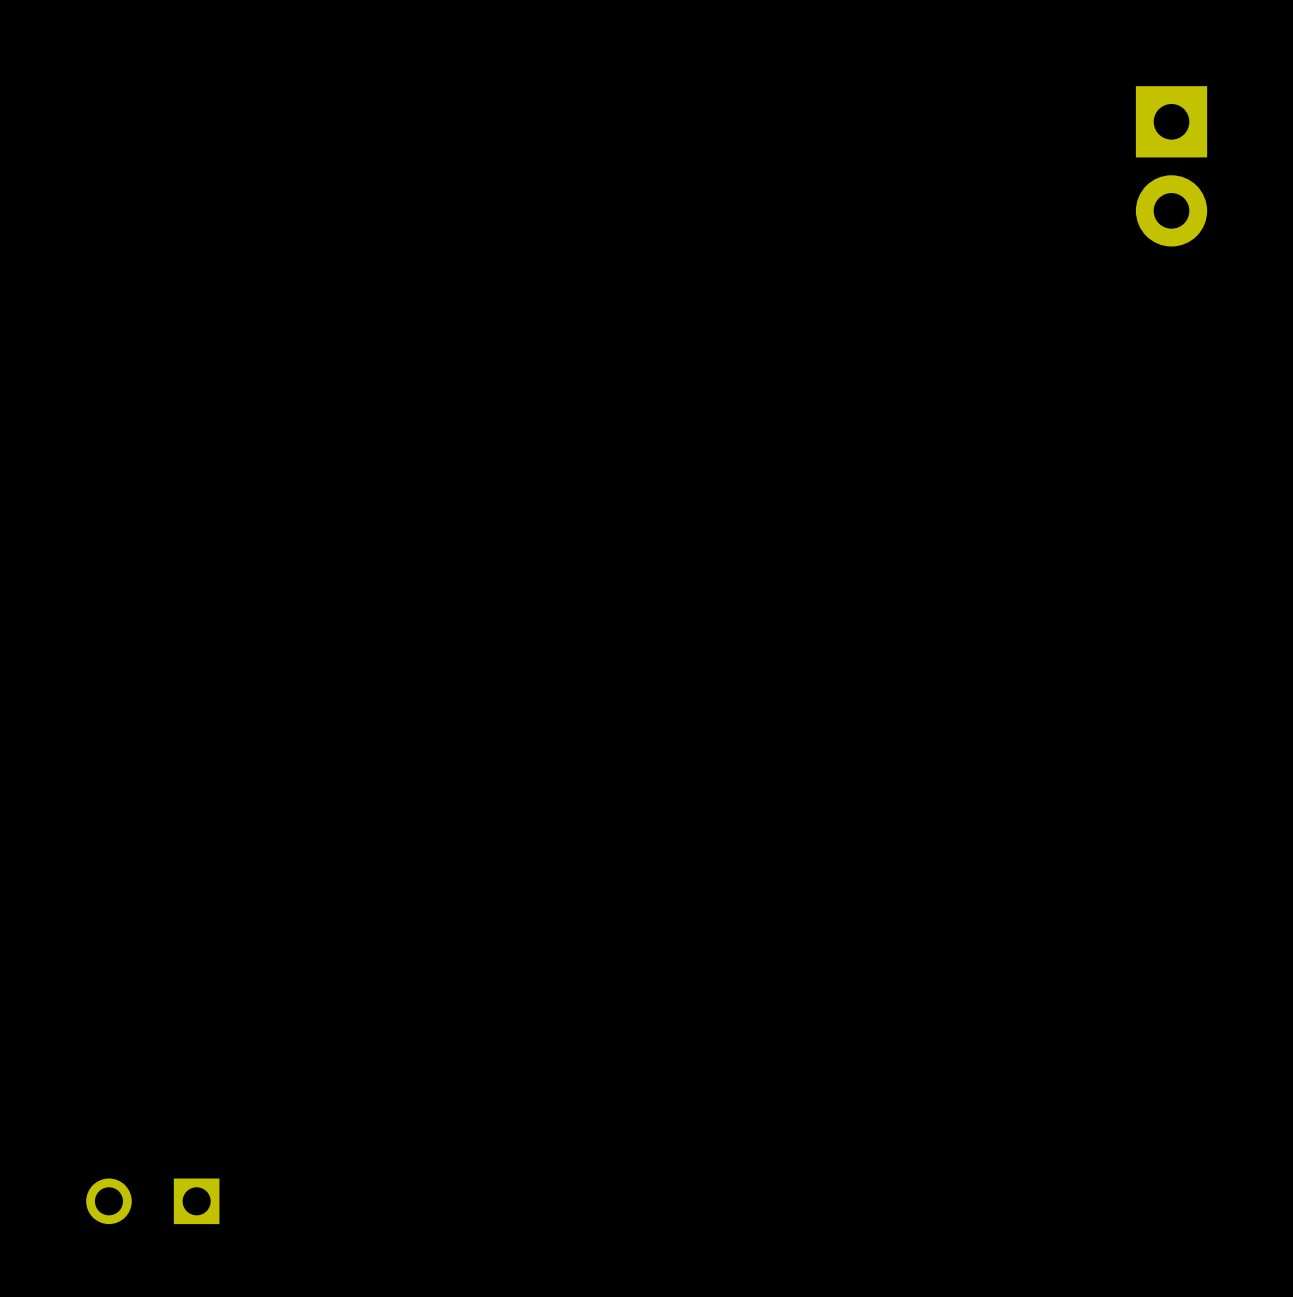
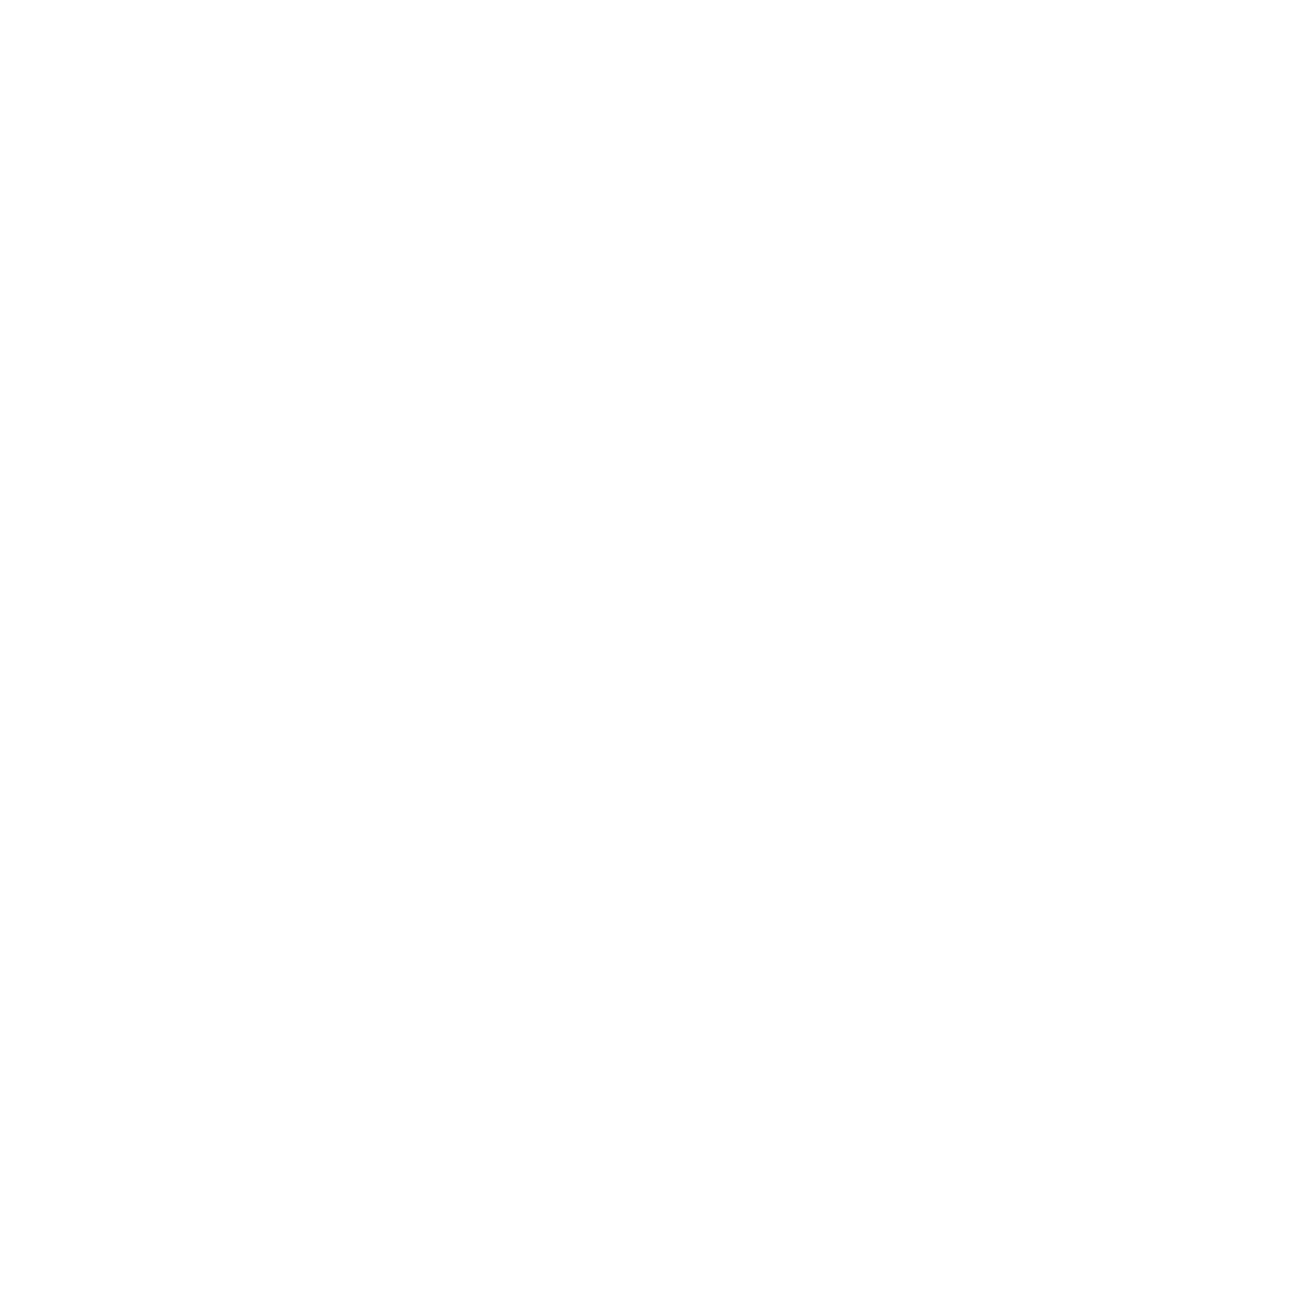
part: (1171, 166) -> none
part: (152, 1201) -> none

